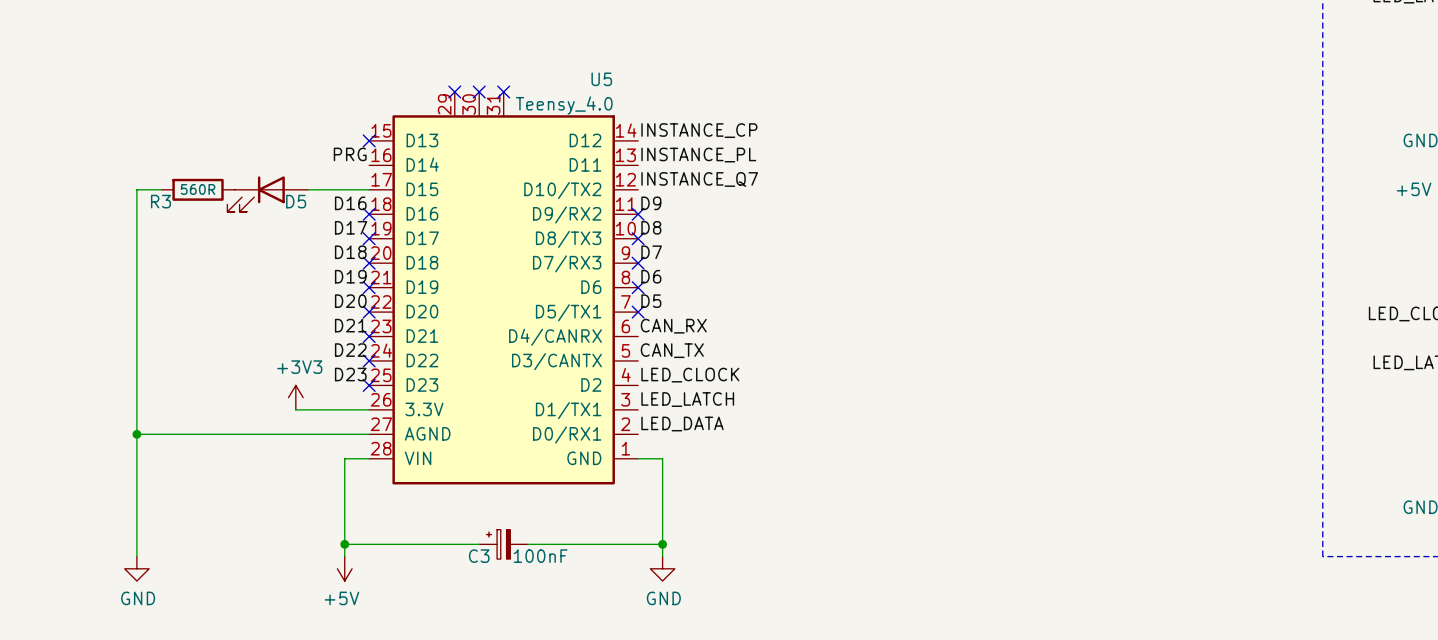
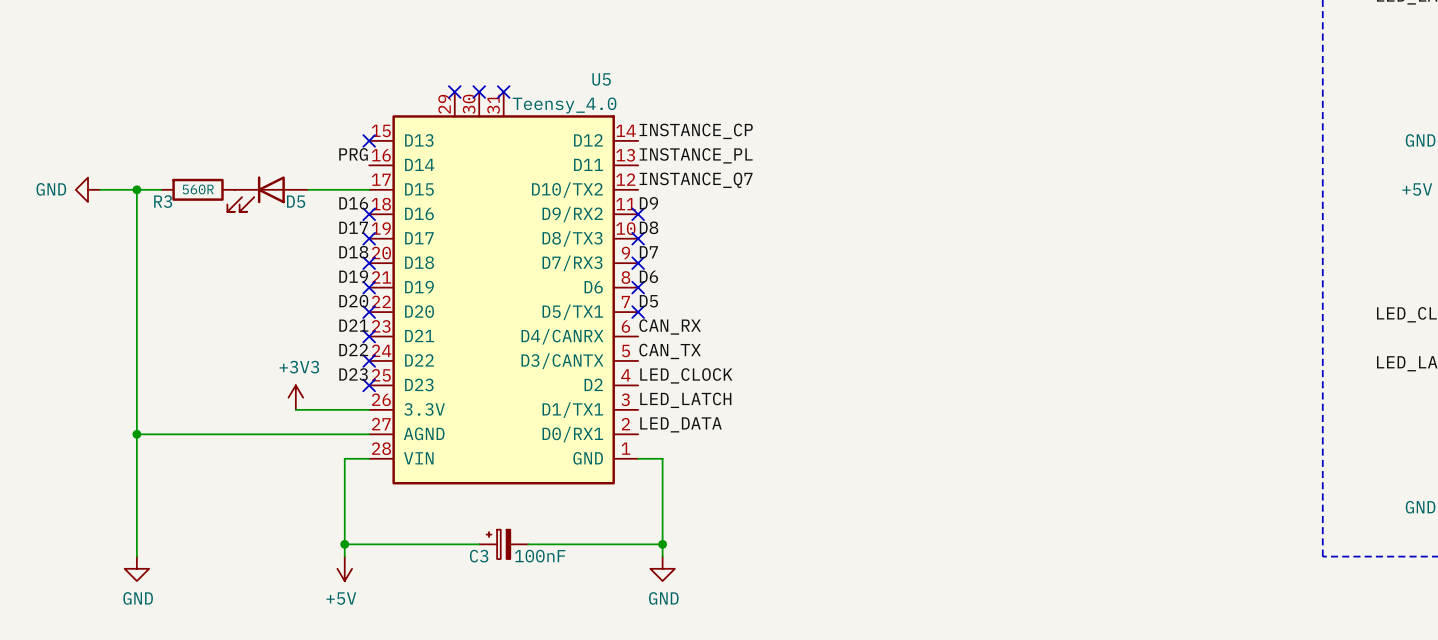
power symbol: none -> GND (88, 189)
wire: none -> (100, 189) (136, 189)
junction: none -> (136, 189)

